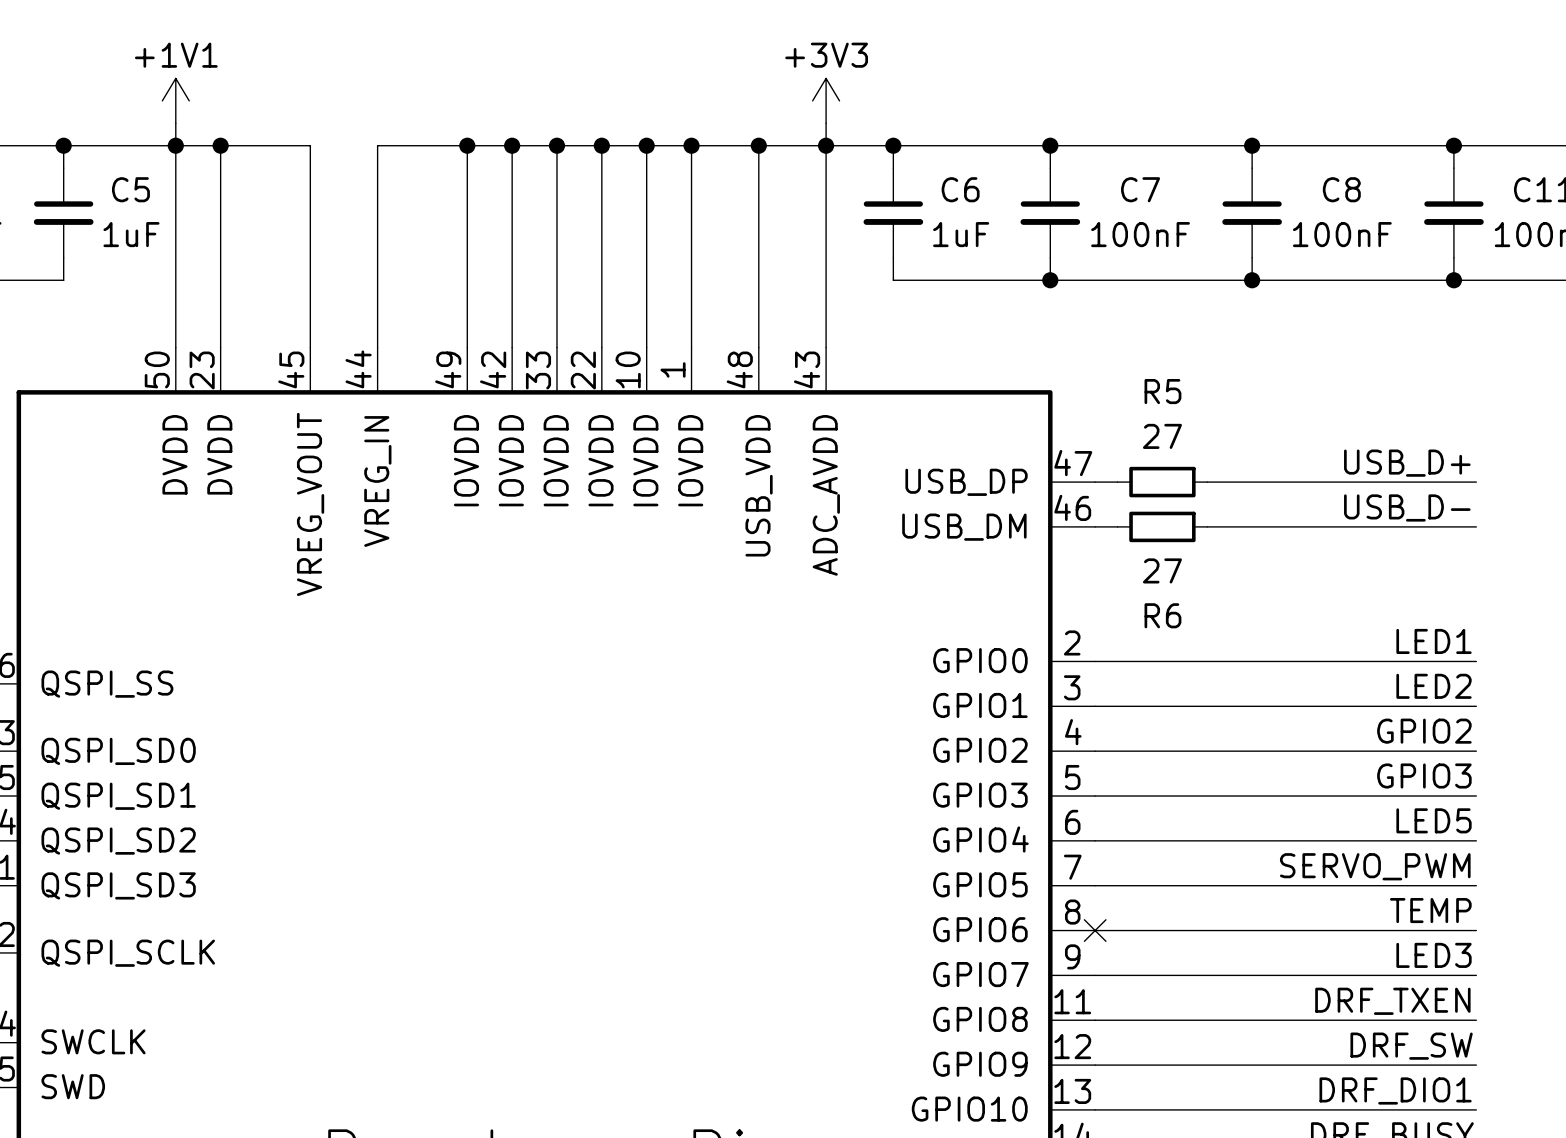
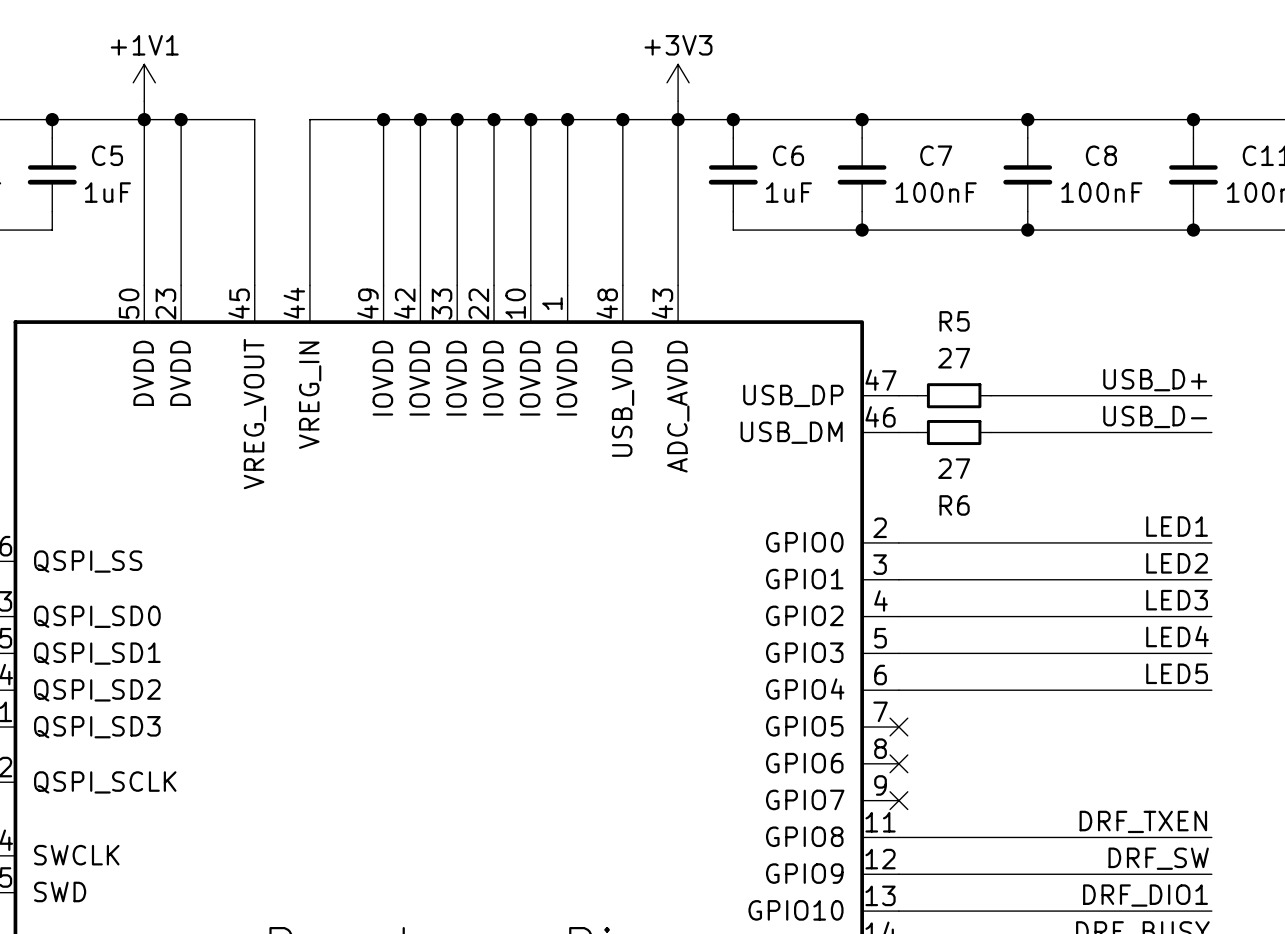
label: GPIO2 (1424, 731) -> LED3 (1177, 600)
label: GPIO3 (1424, 775) -> LED4 (1177, 636)
label: SERVO_PWM (1375, 866) -> none
wire: (1095, 885) (1476, 885) -> none
no-connect mark: none -> (898, 727)
label: TEMP (1430, 910) -> none
wire: (1095, 930) (1476, 930) -> none
label: LED3 (1434, 955) -> none
wire: (1095, 975) (1476, 975) -> none
no-connect mark: none -> (898, 800)

